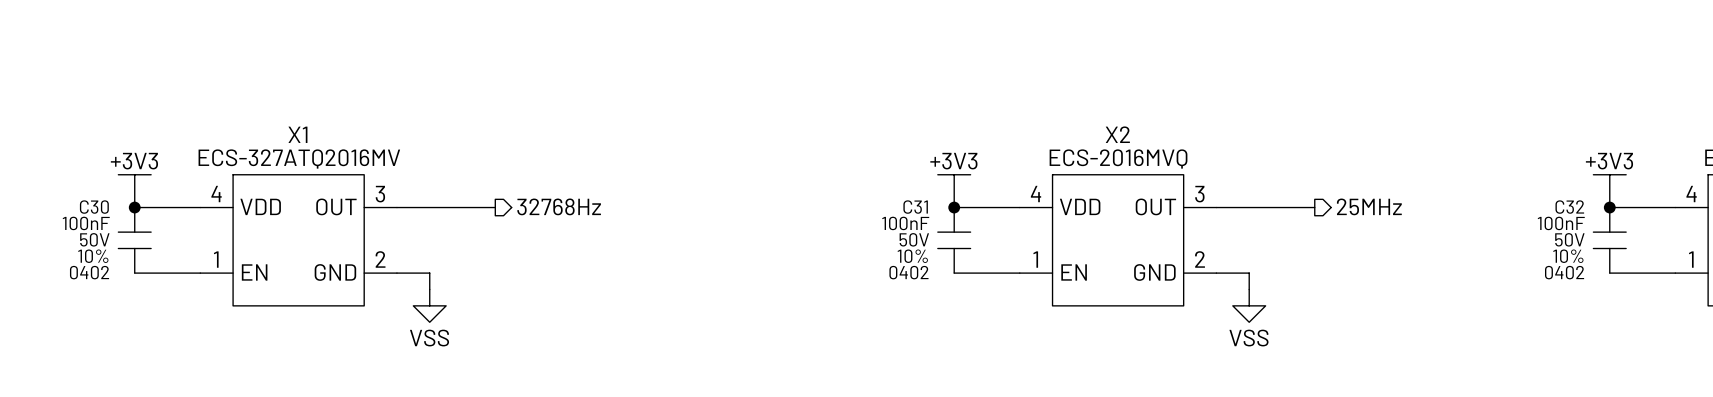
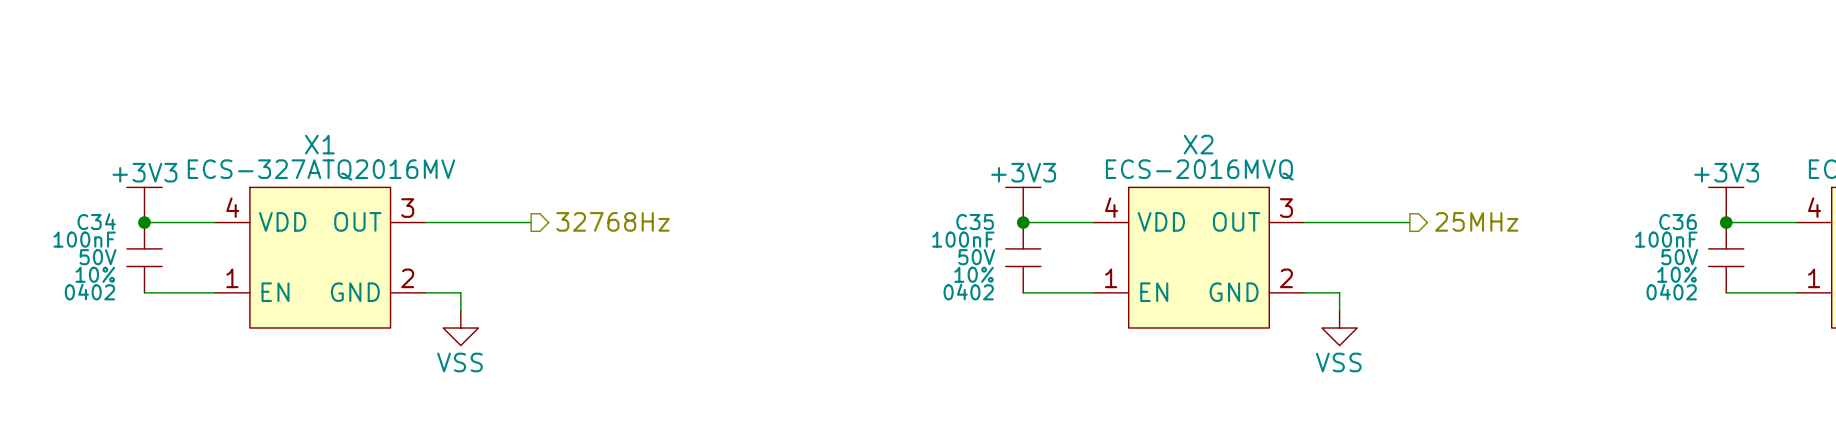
C30 name: C30 (94, 207) -> C34 (96, 221)
C31 name: C31 (915, 207) -> C35 (975, 222)
C32 name: C32 (1569, 207) -> C36 (1678, 222)

